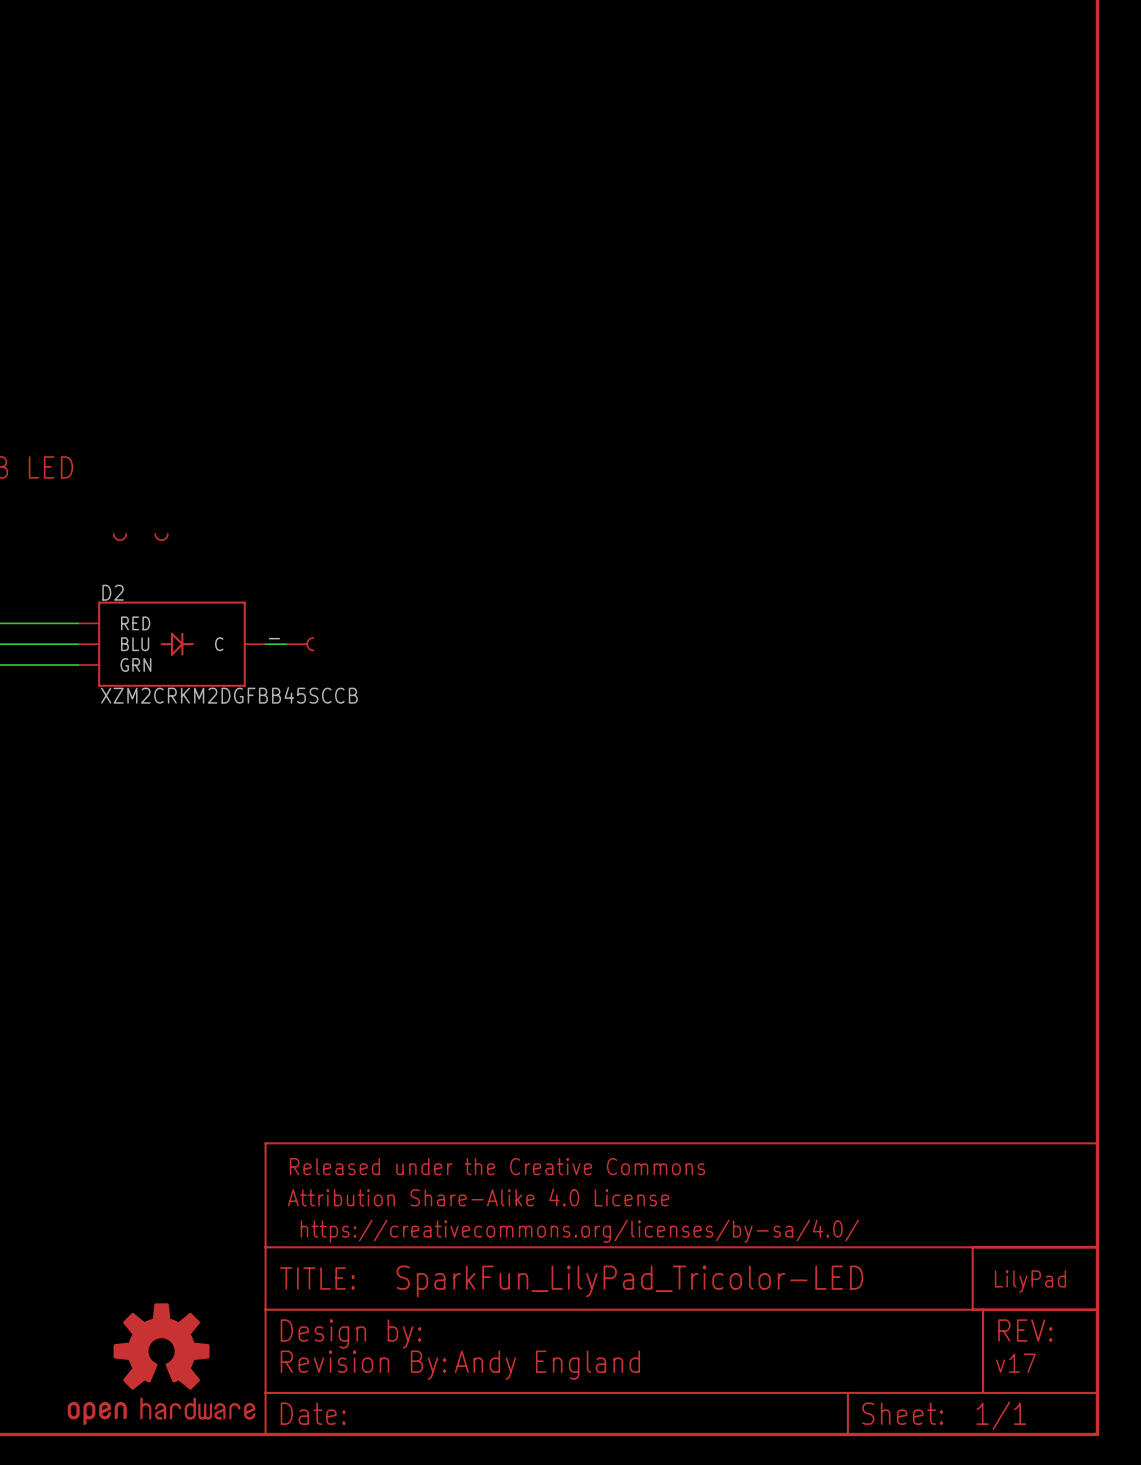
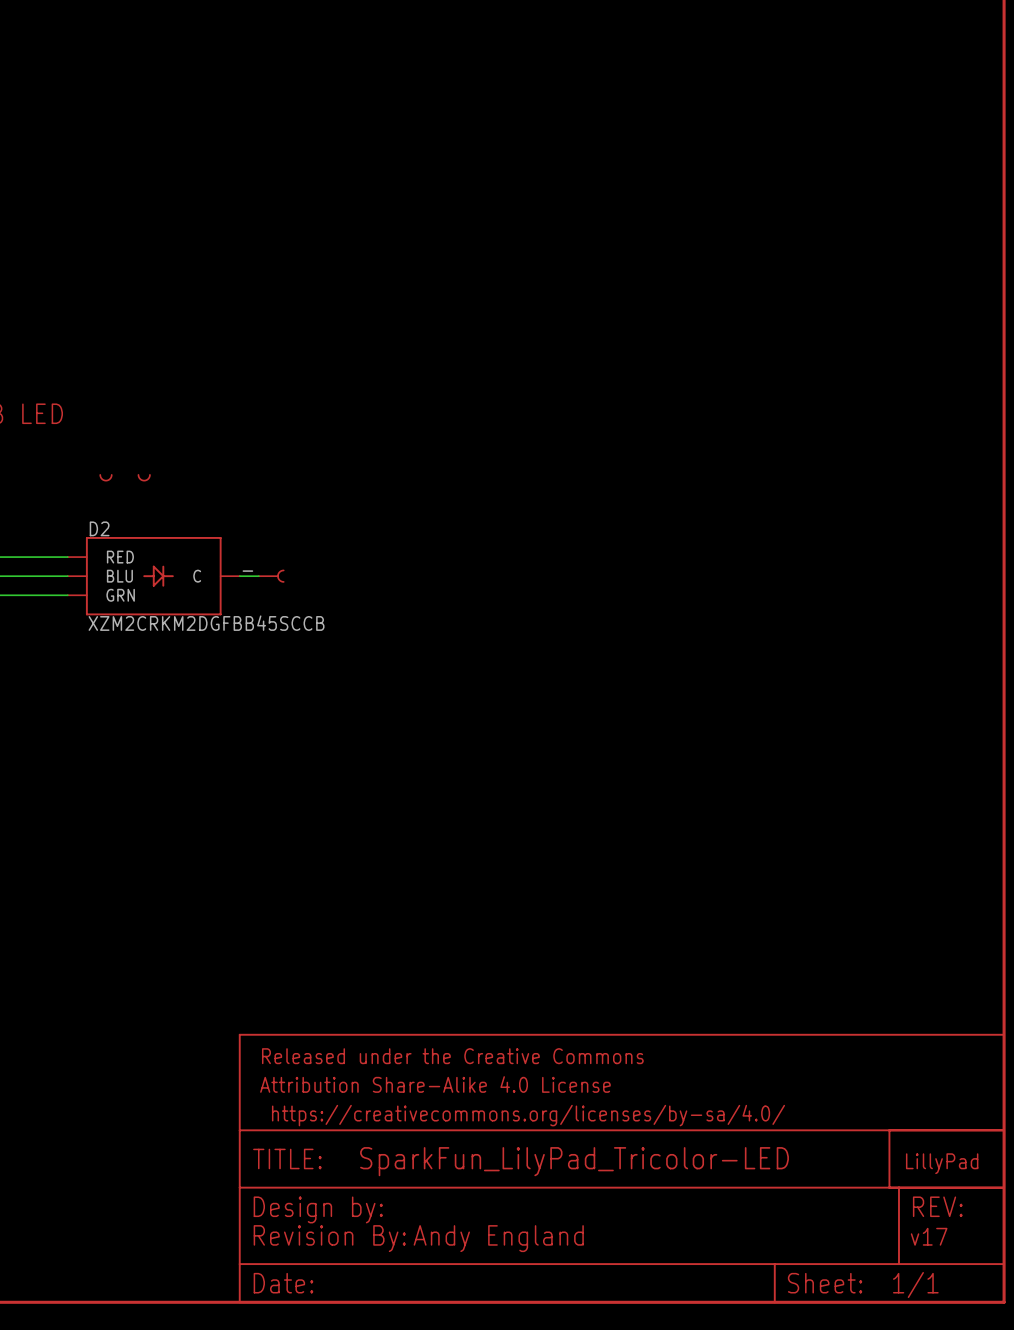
part text: LilyPad (1030, 1281) -> none
part text: none -> LillyPad (942, 1163)
part: (161, 1364) -> none

